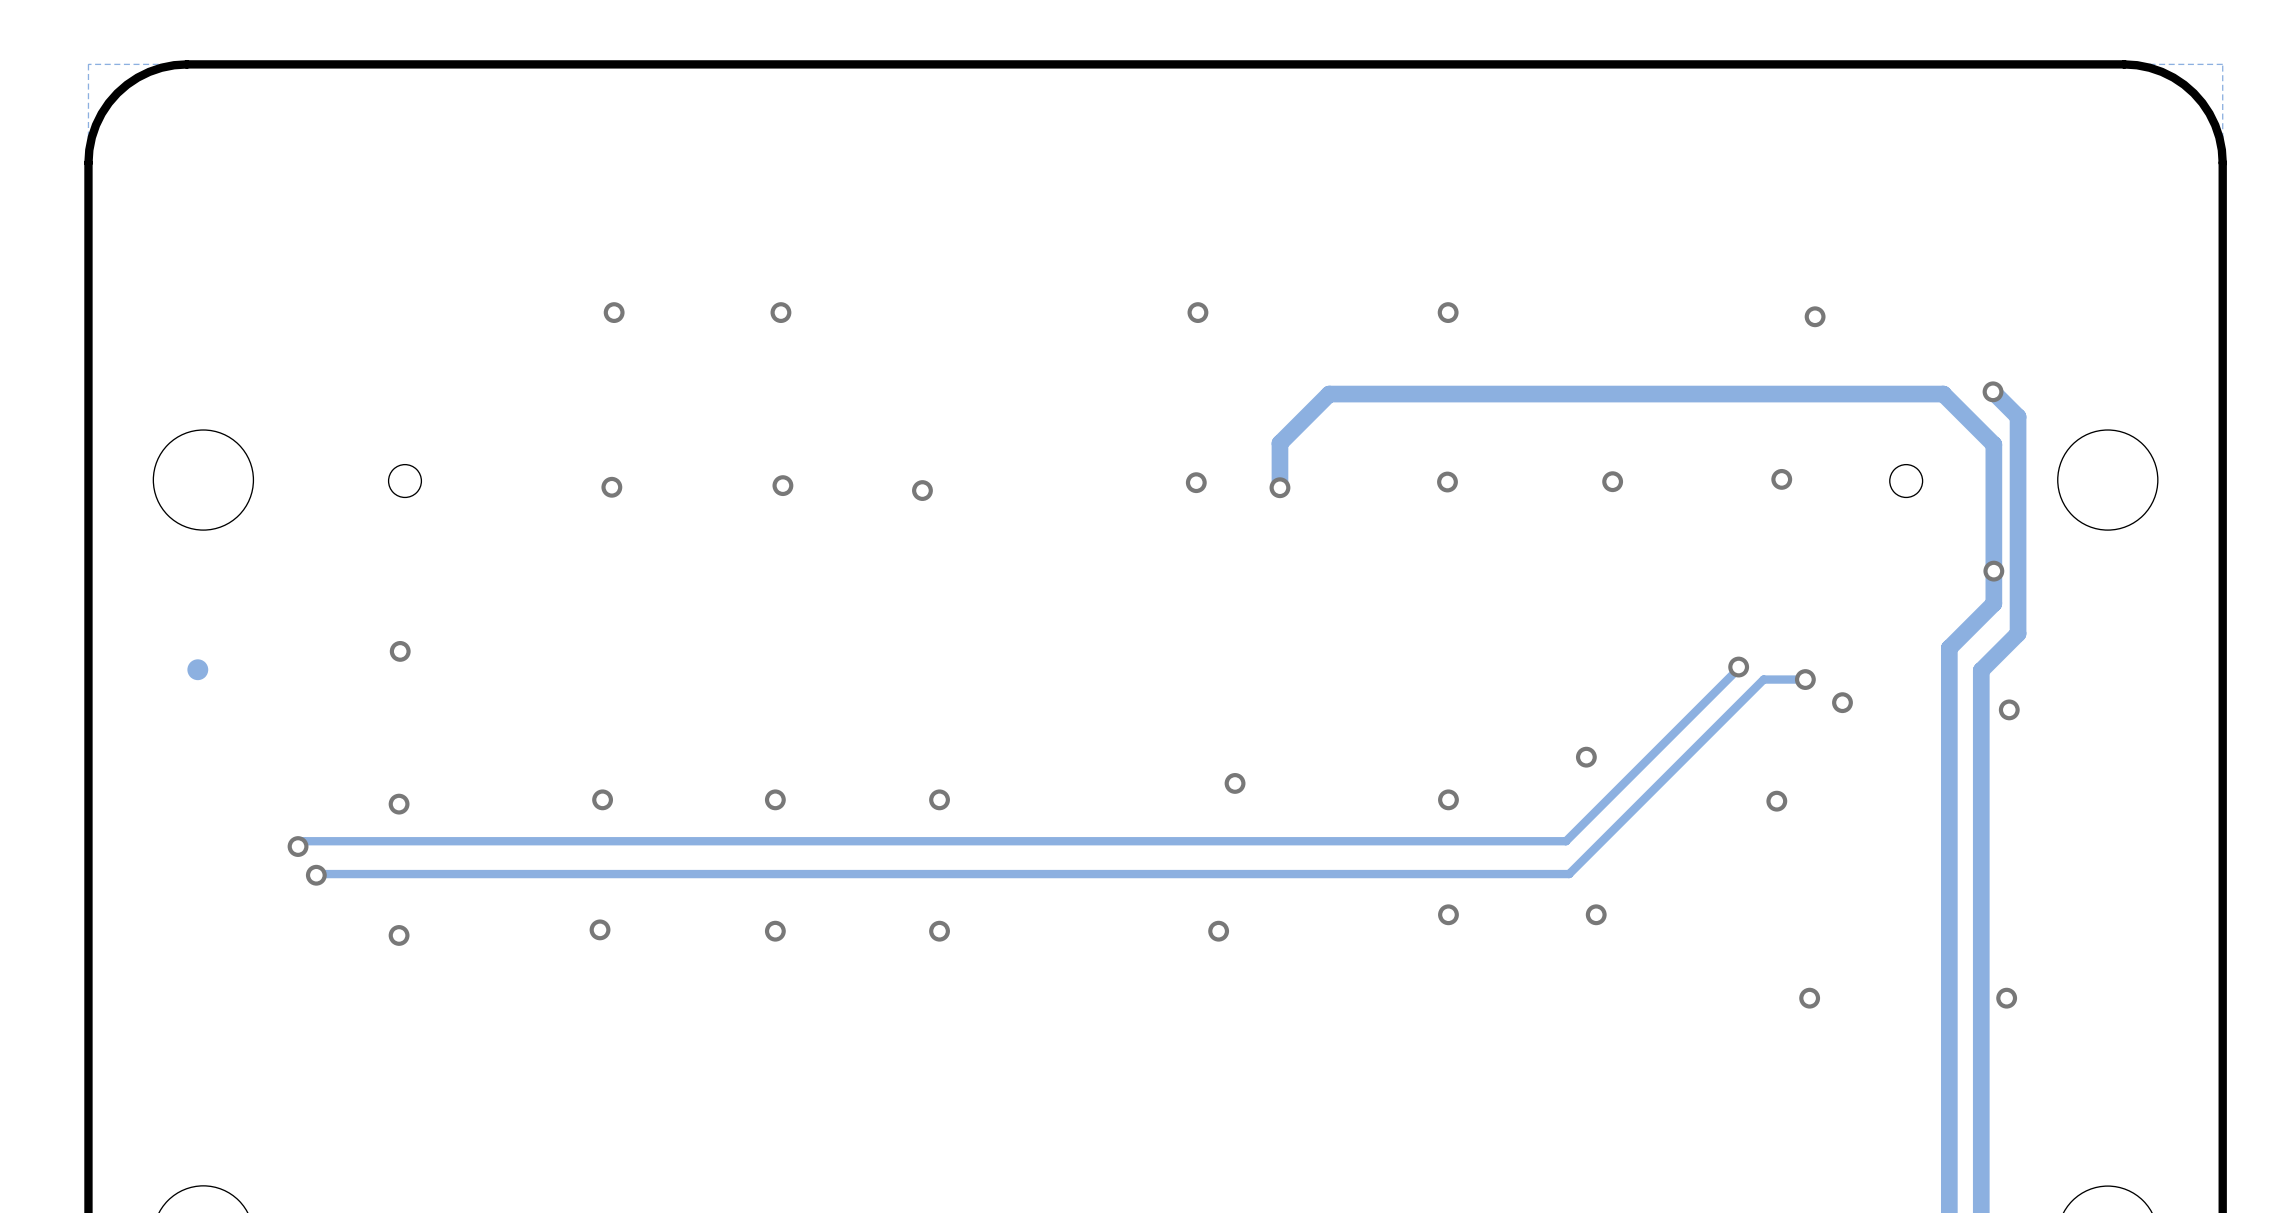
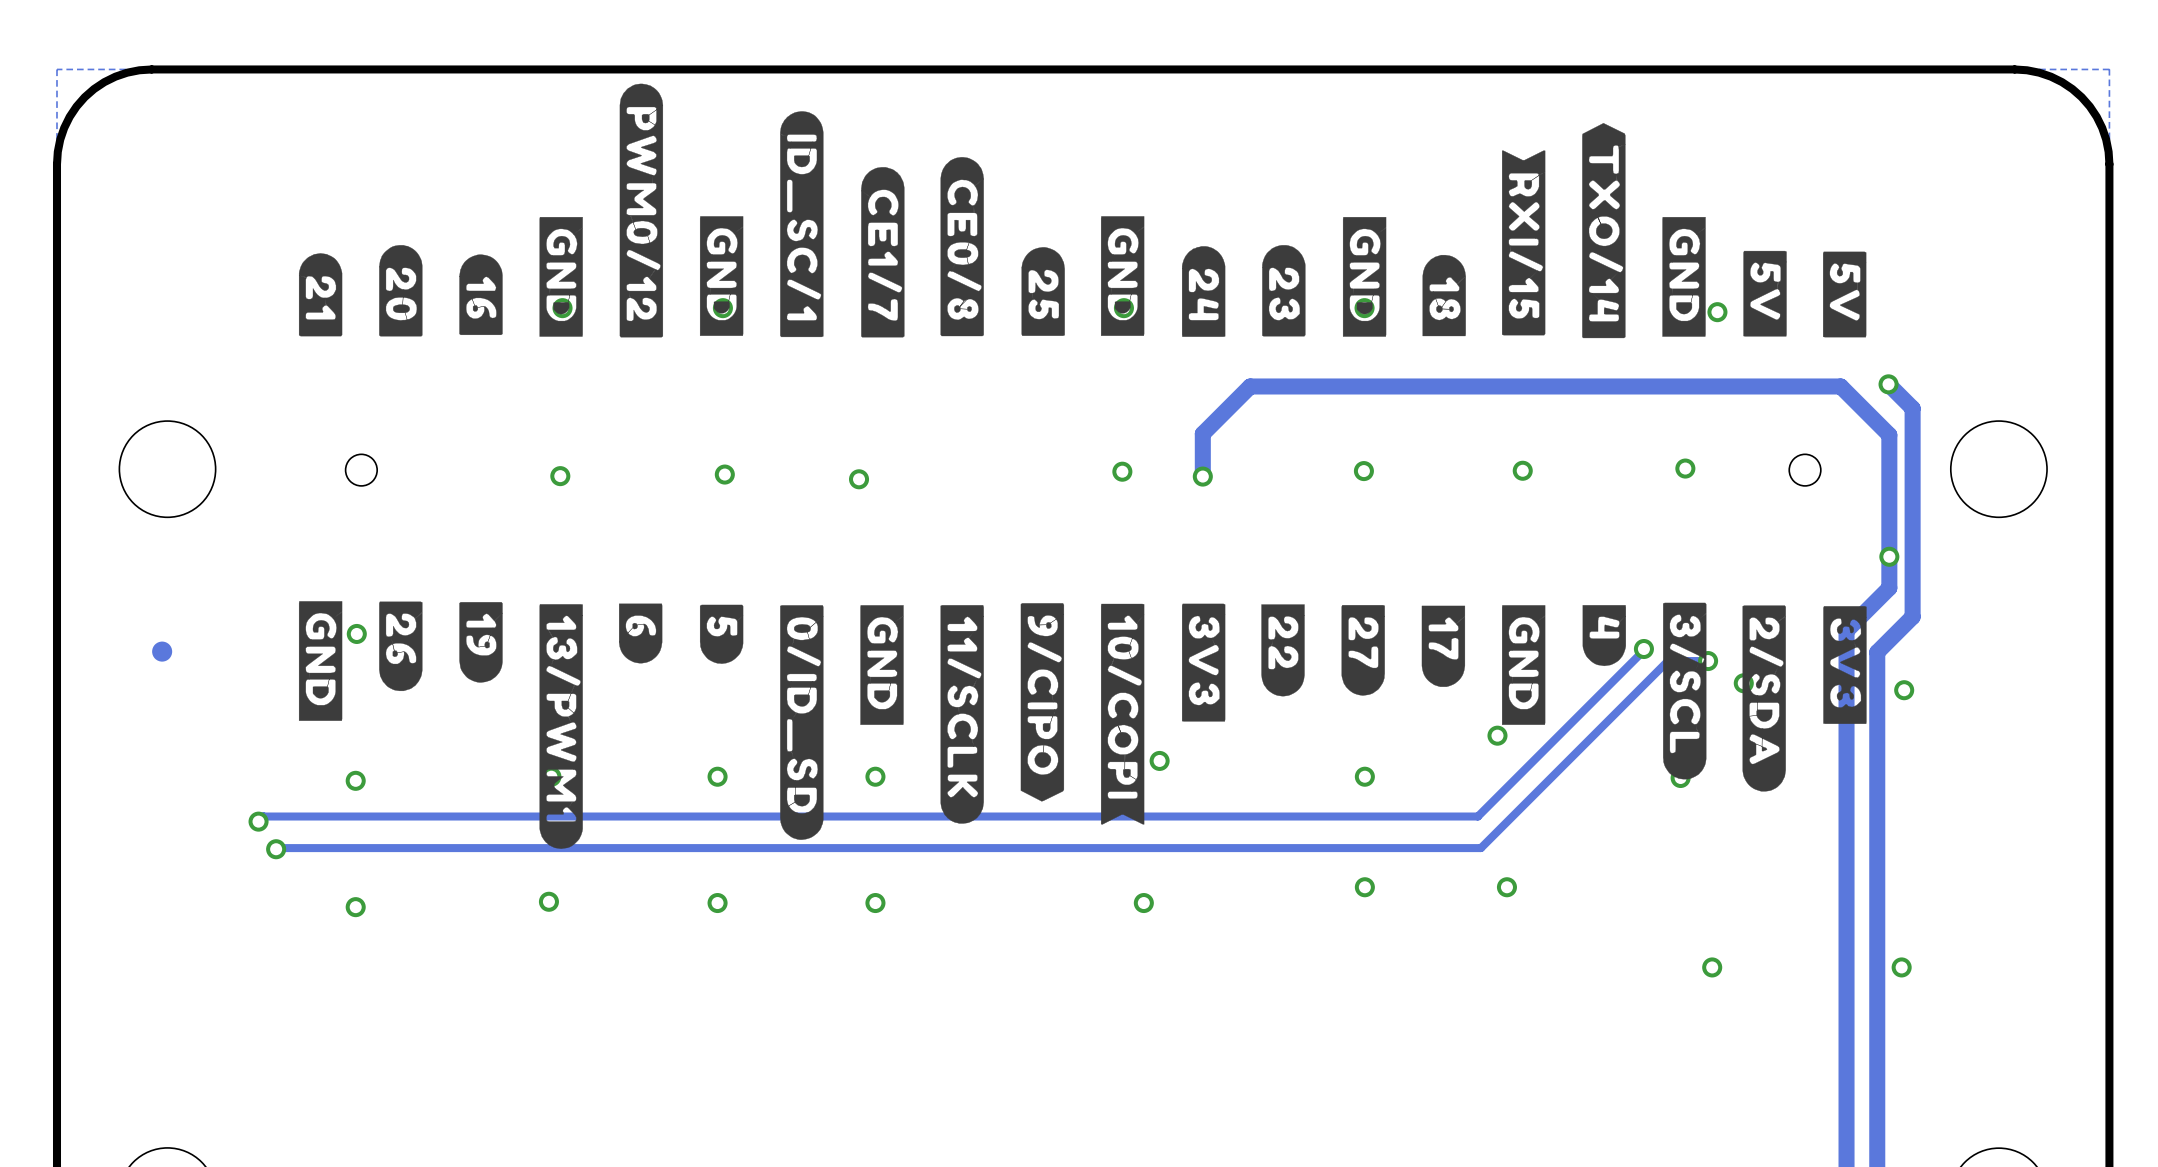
drawing: none -> [298, 83, 1867, 339]
drawing: none -> [298, 601, 1867, 849]

